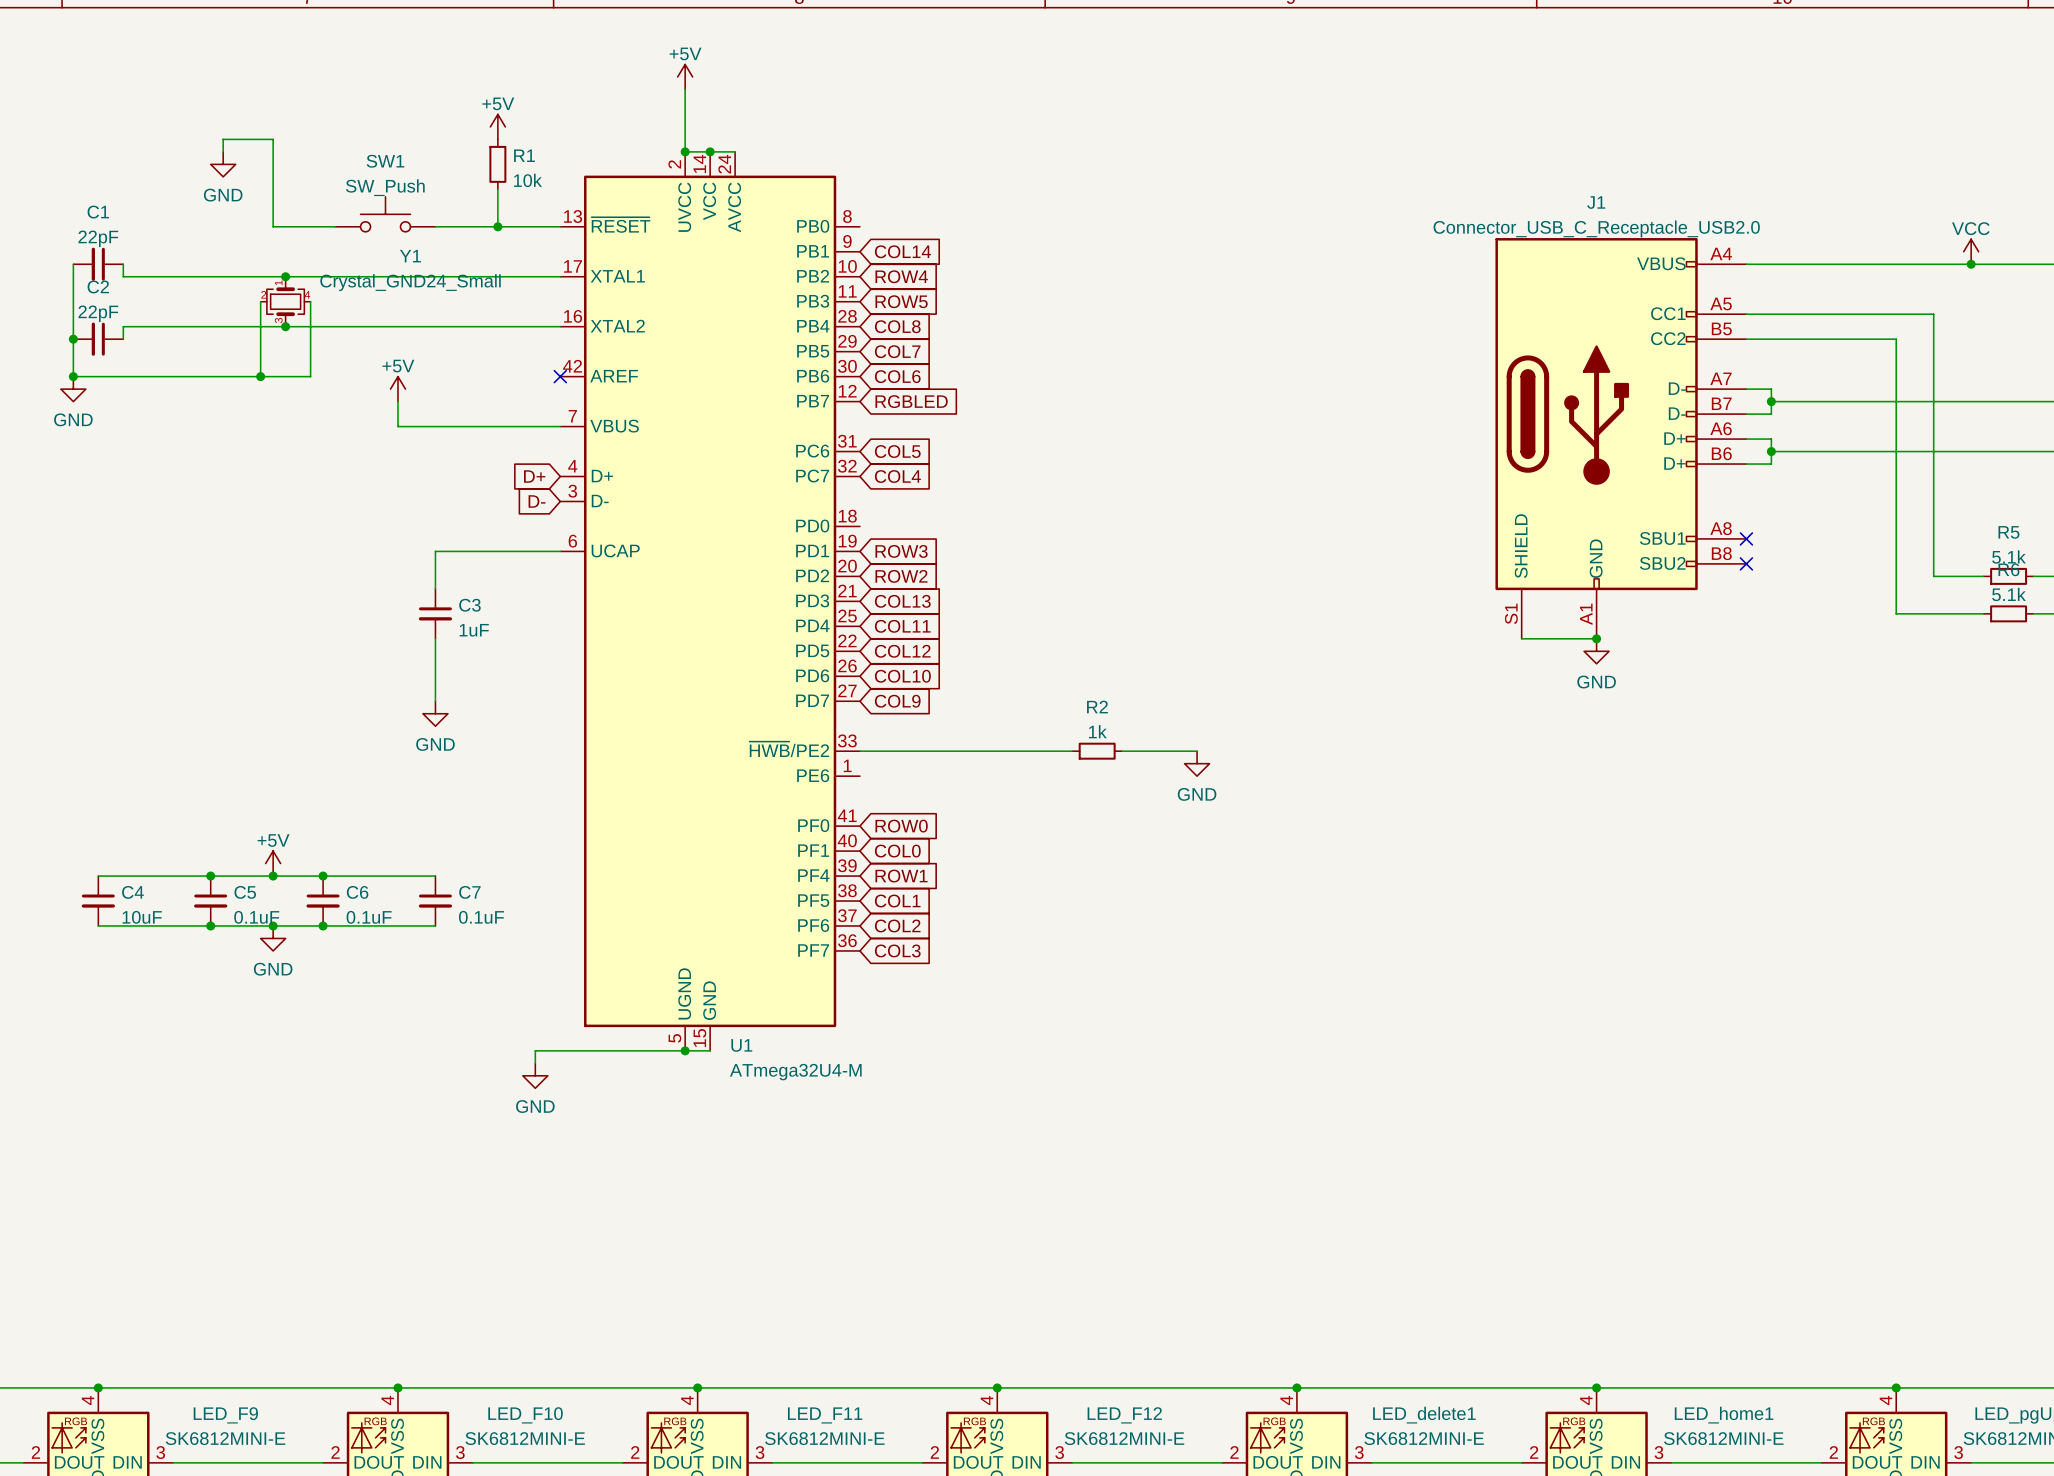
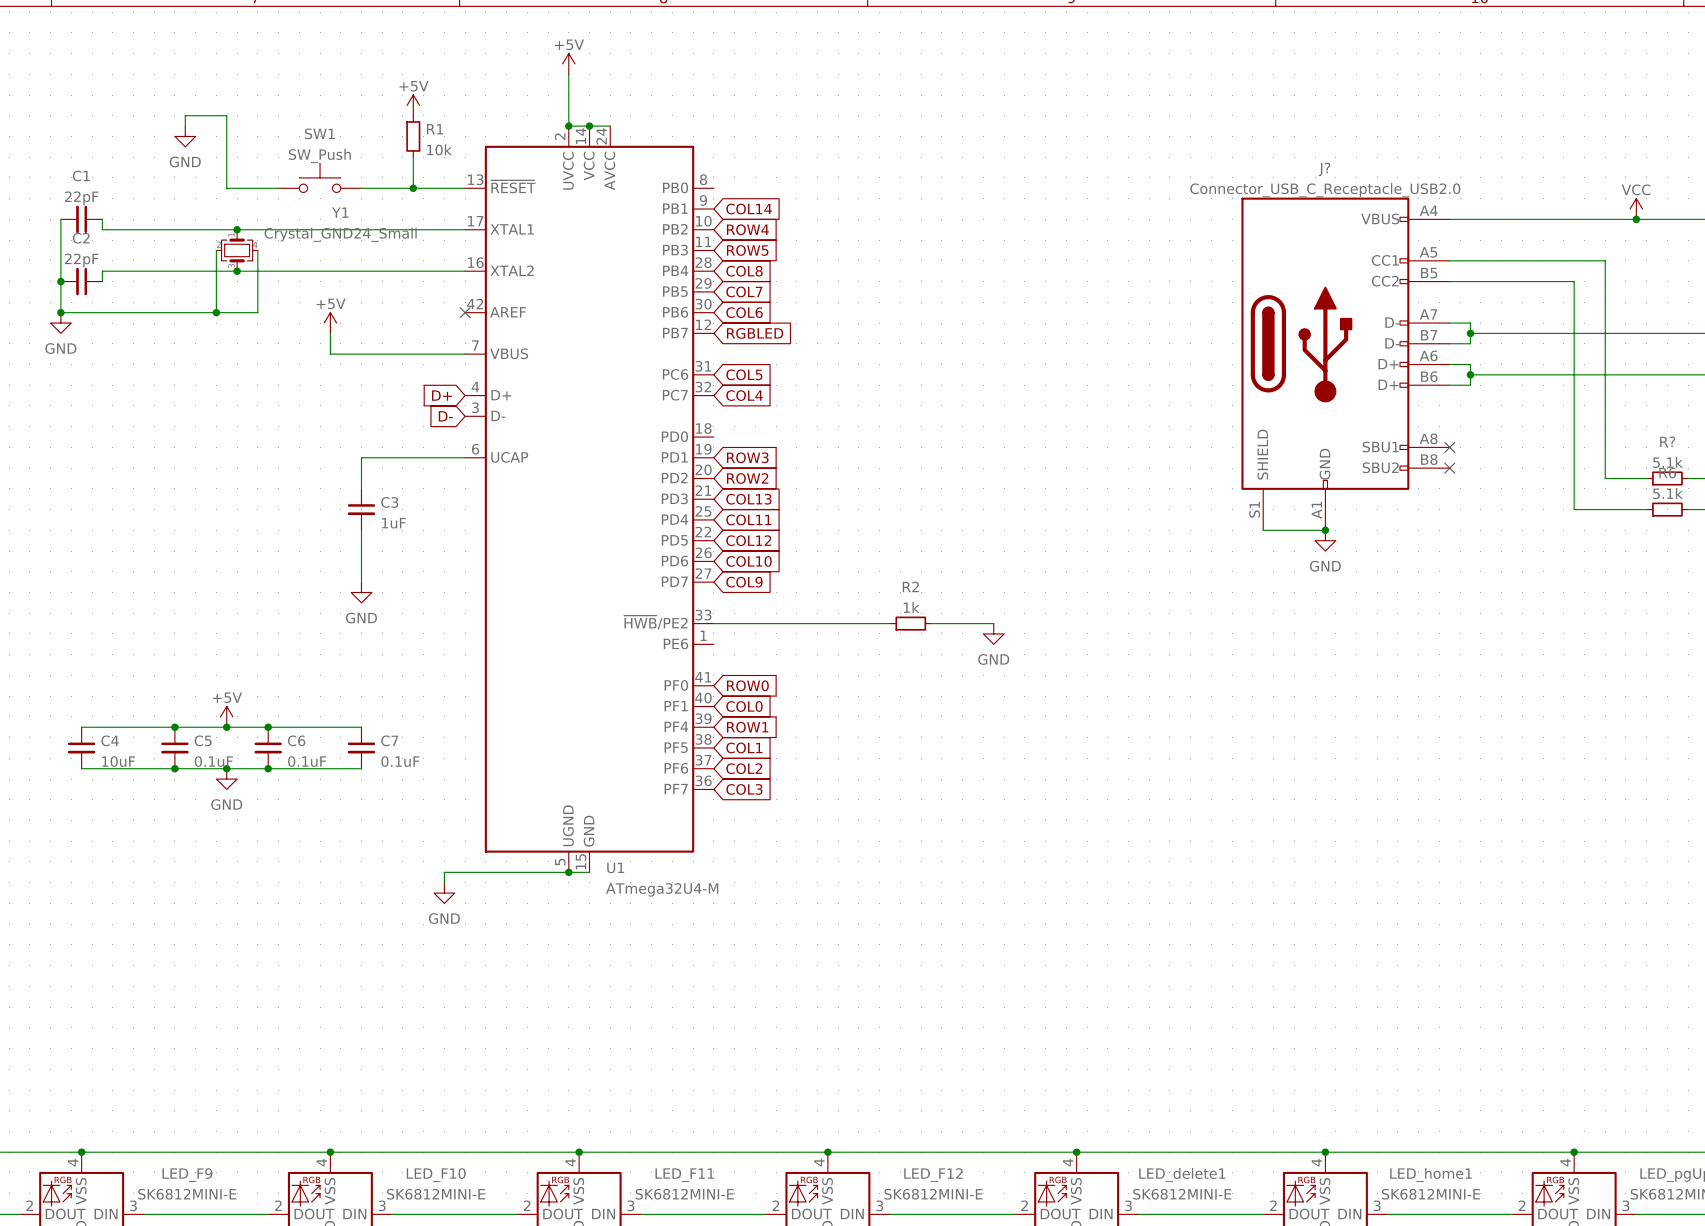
J1 name: J1 (1596, 202) -> J? (1324, 169)
R5 name: R5 (2008, 532) -> R? (1667, 441)

